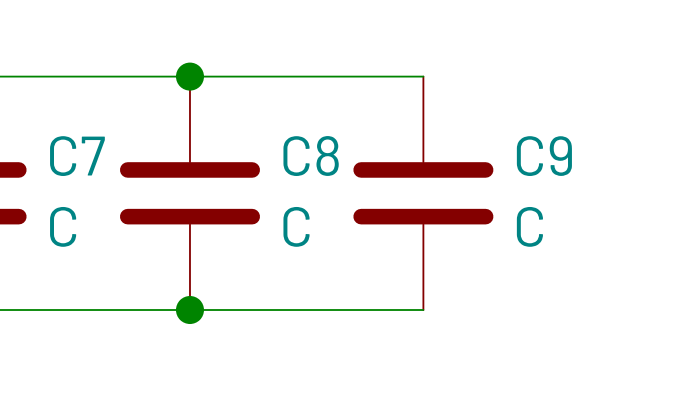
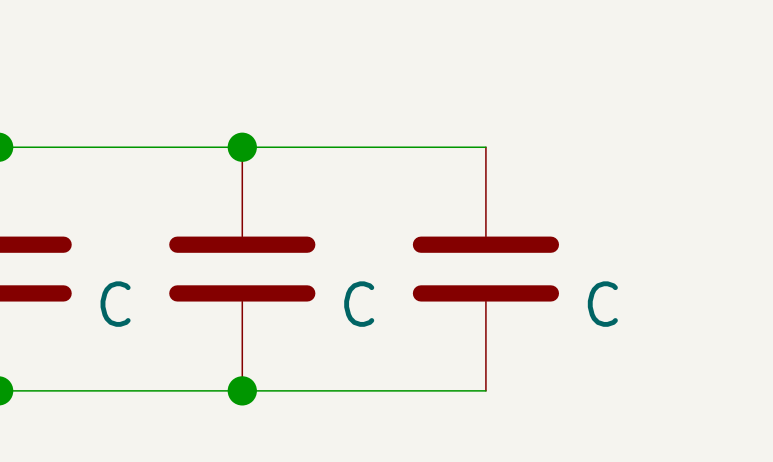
C7 name: C7 (77, 156) -> none
C8 name: C8 (311, 156) -> none
C9 name: C9 (544, 156) -> none

